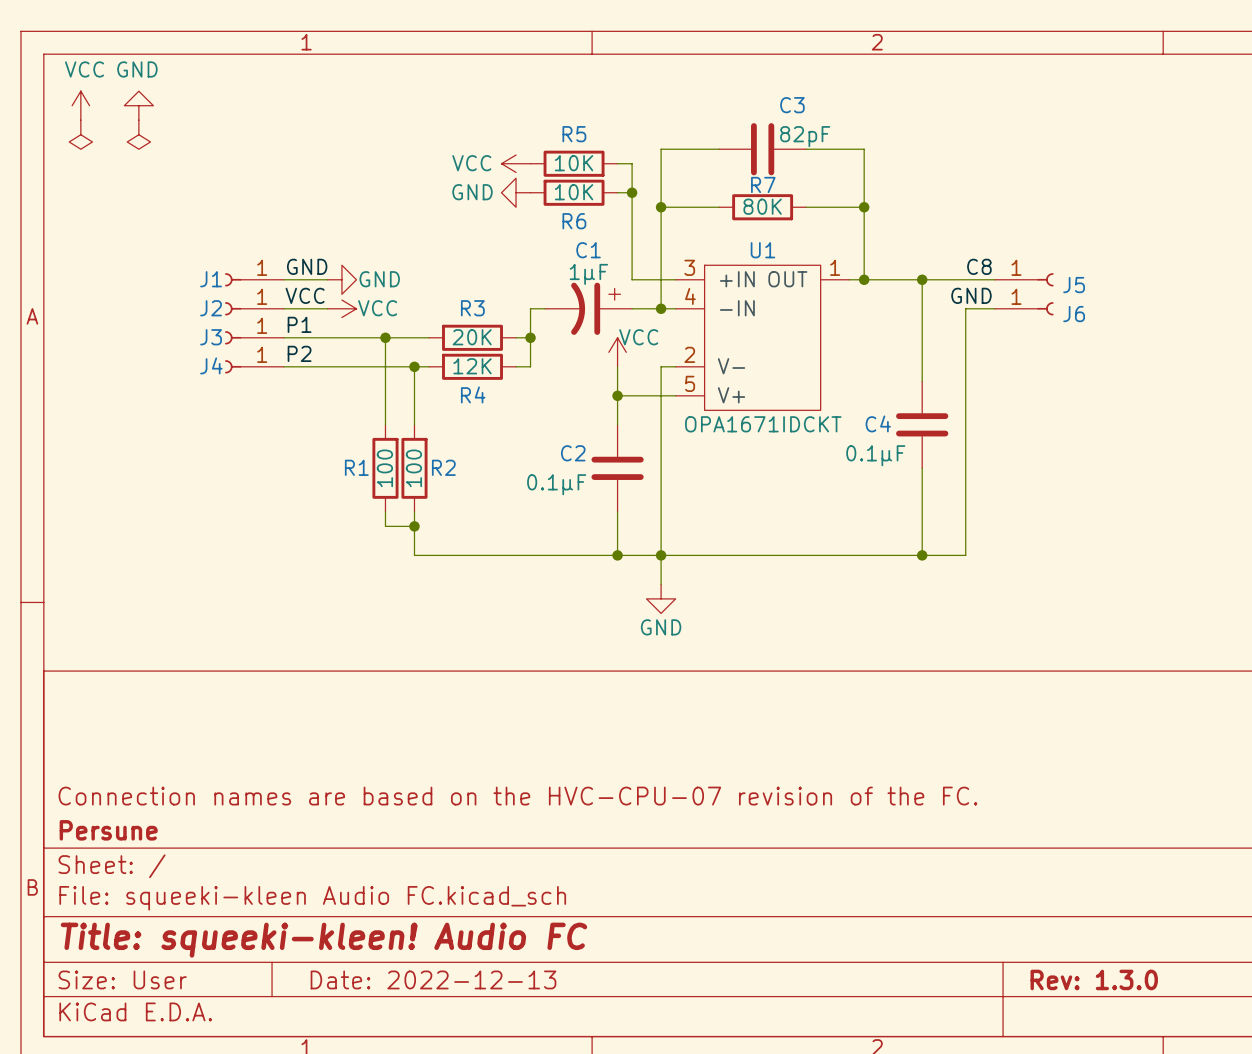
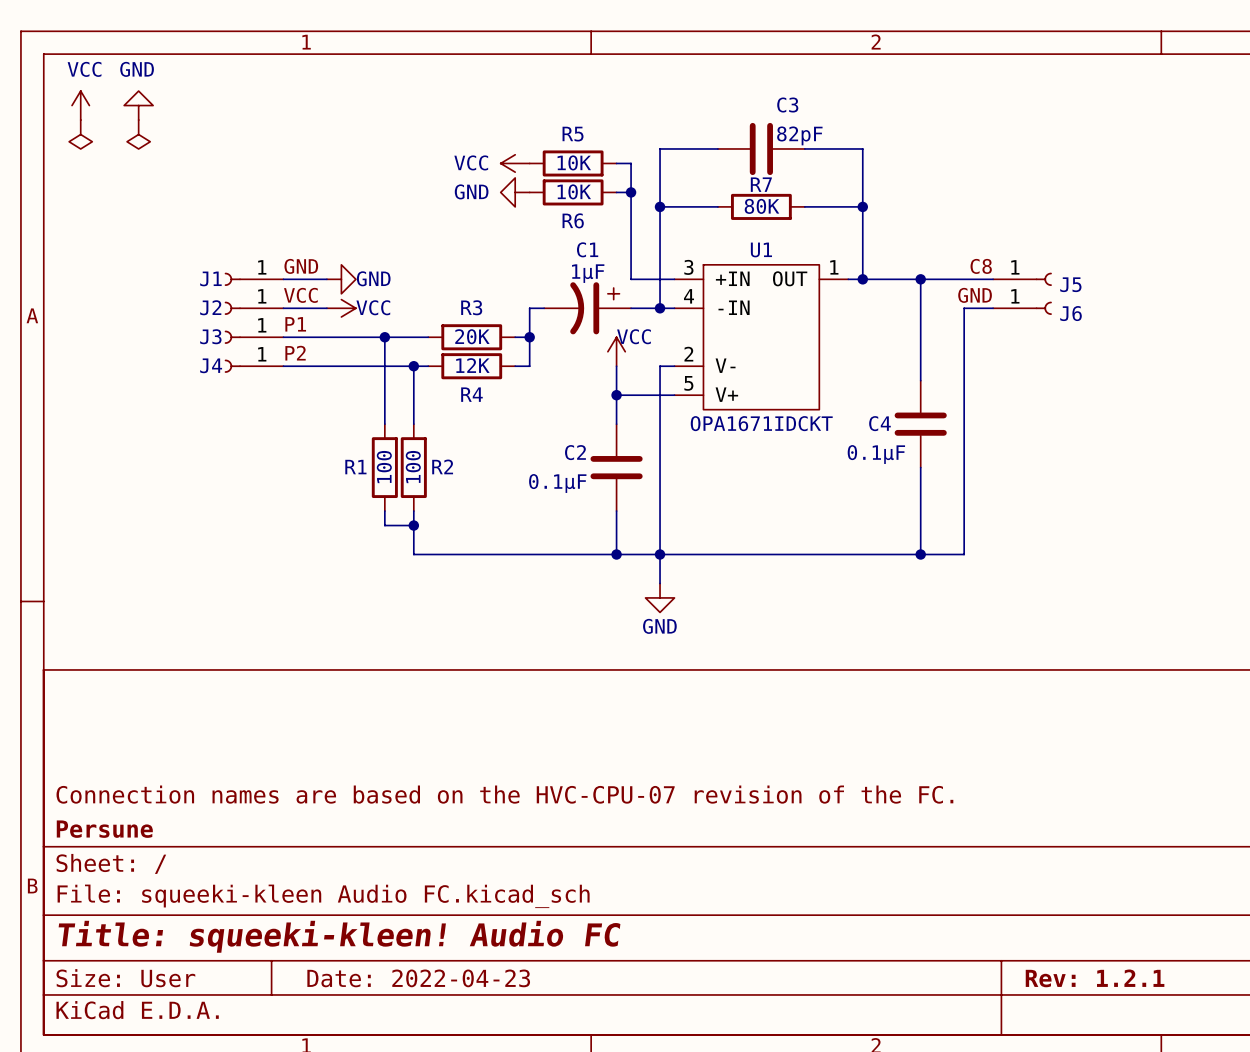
title block: Date: 2022-12-13 (433, 979) -> Date: 2022-04-23 (418, 978)
title block: Rev: 1.3.0 (1094, 979) -> Rev: 1.2.1 (1095, 978)

